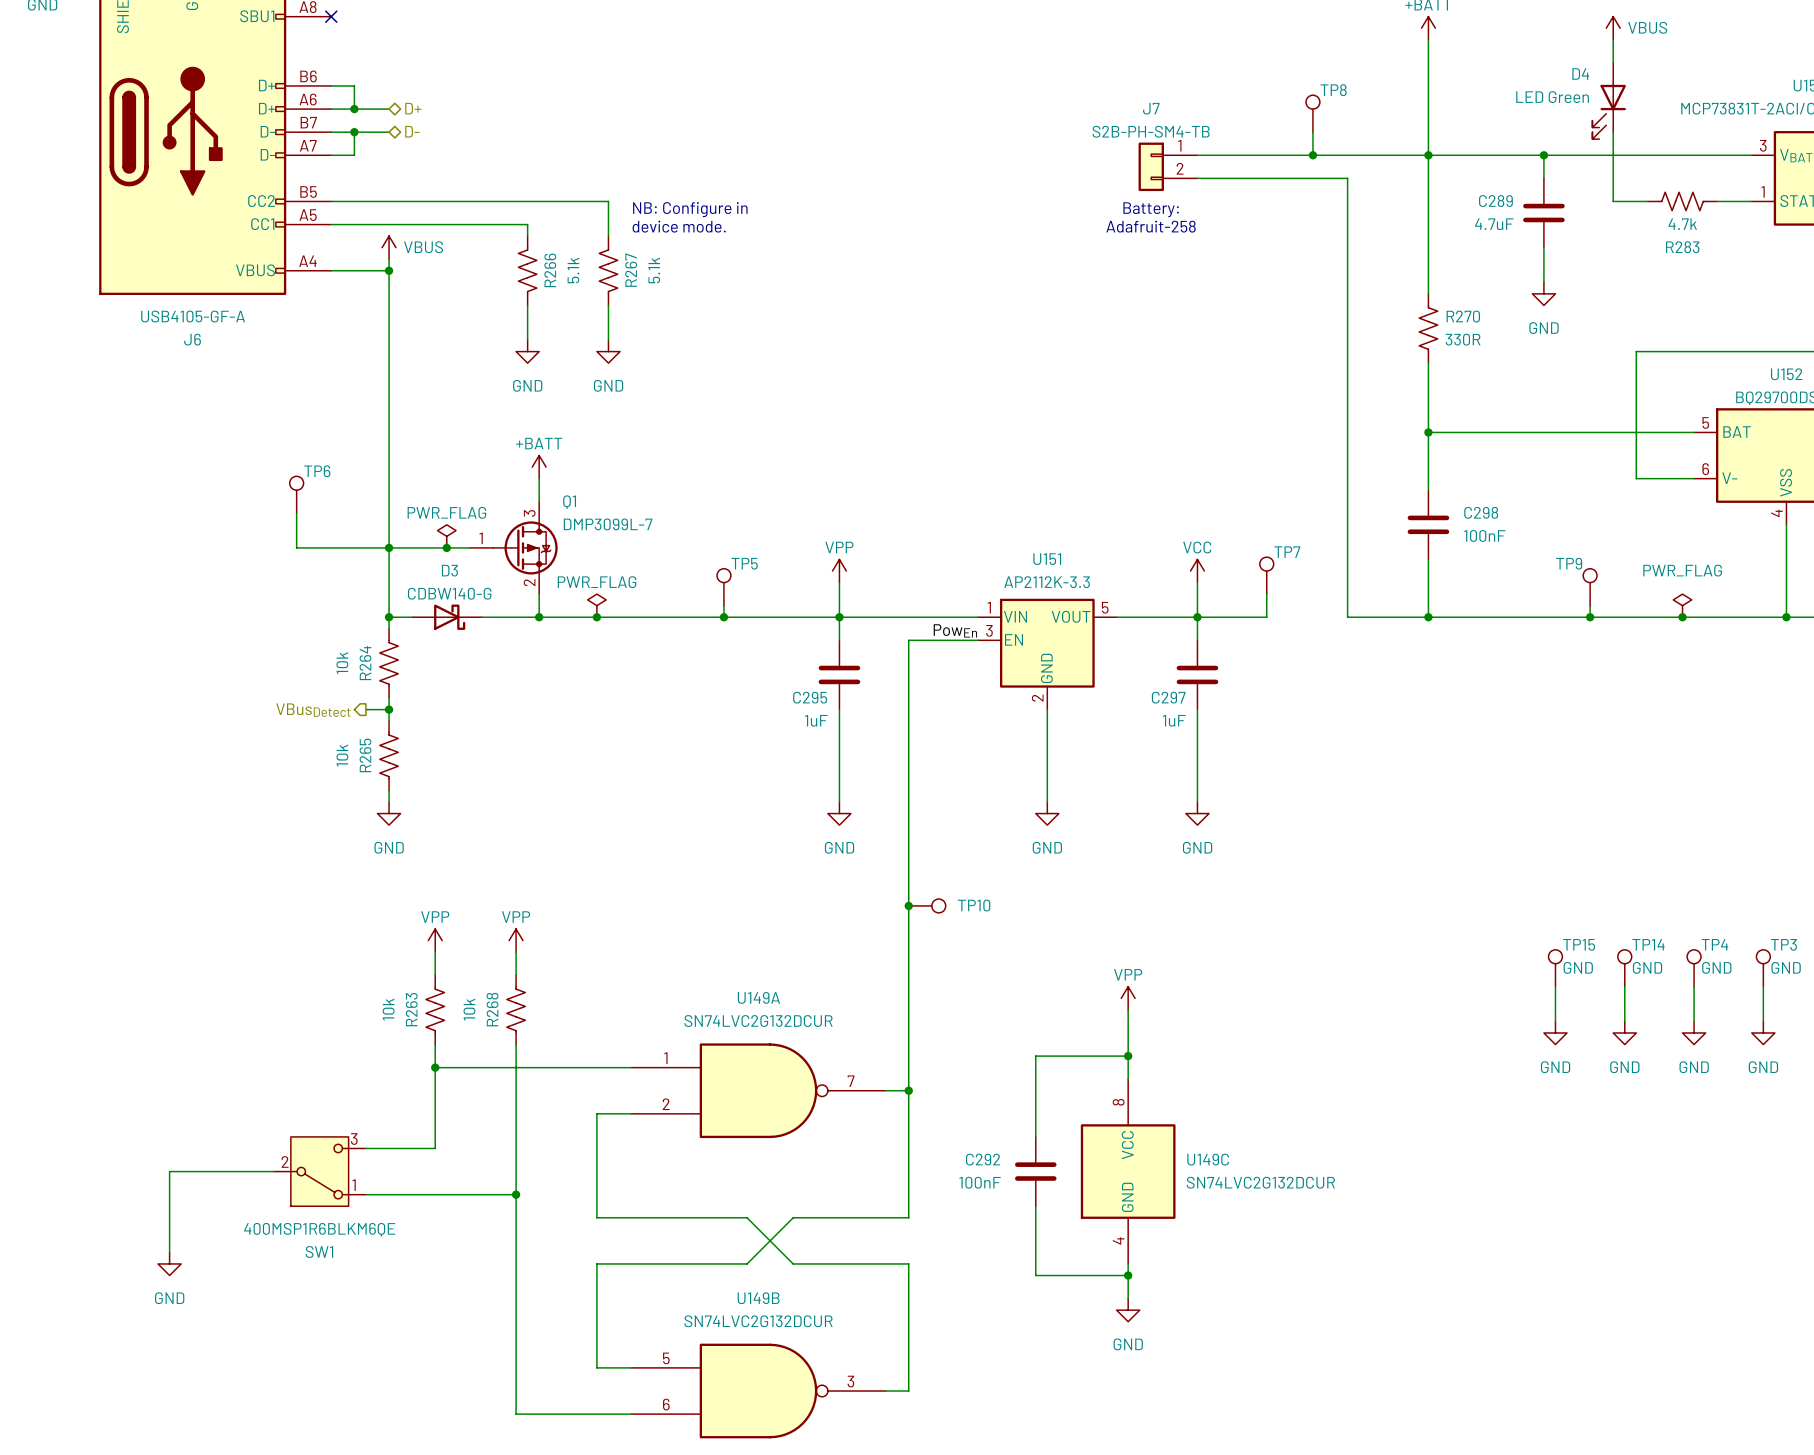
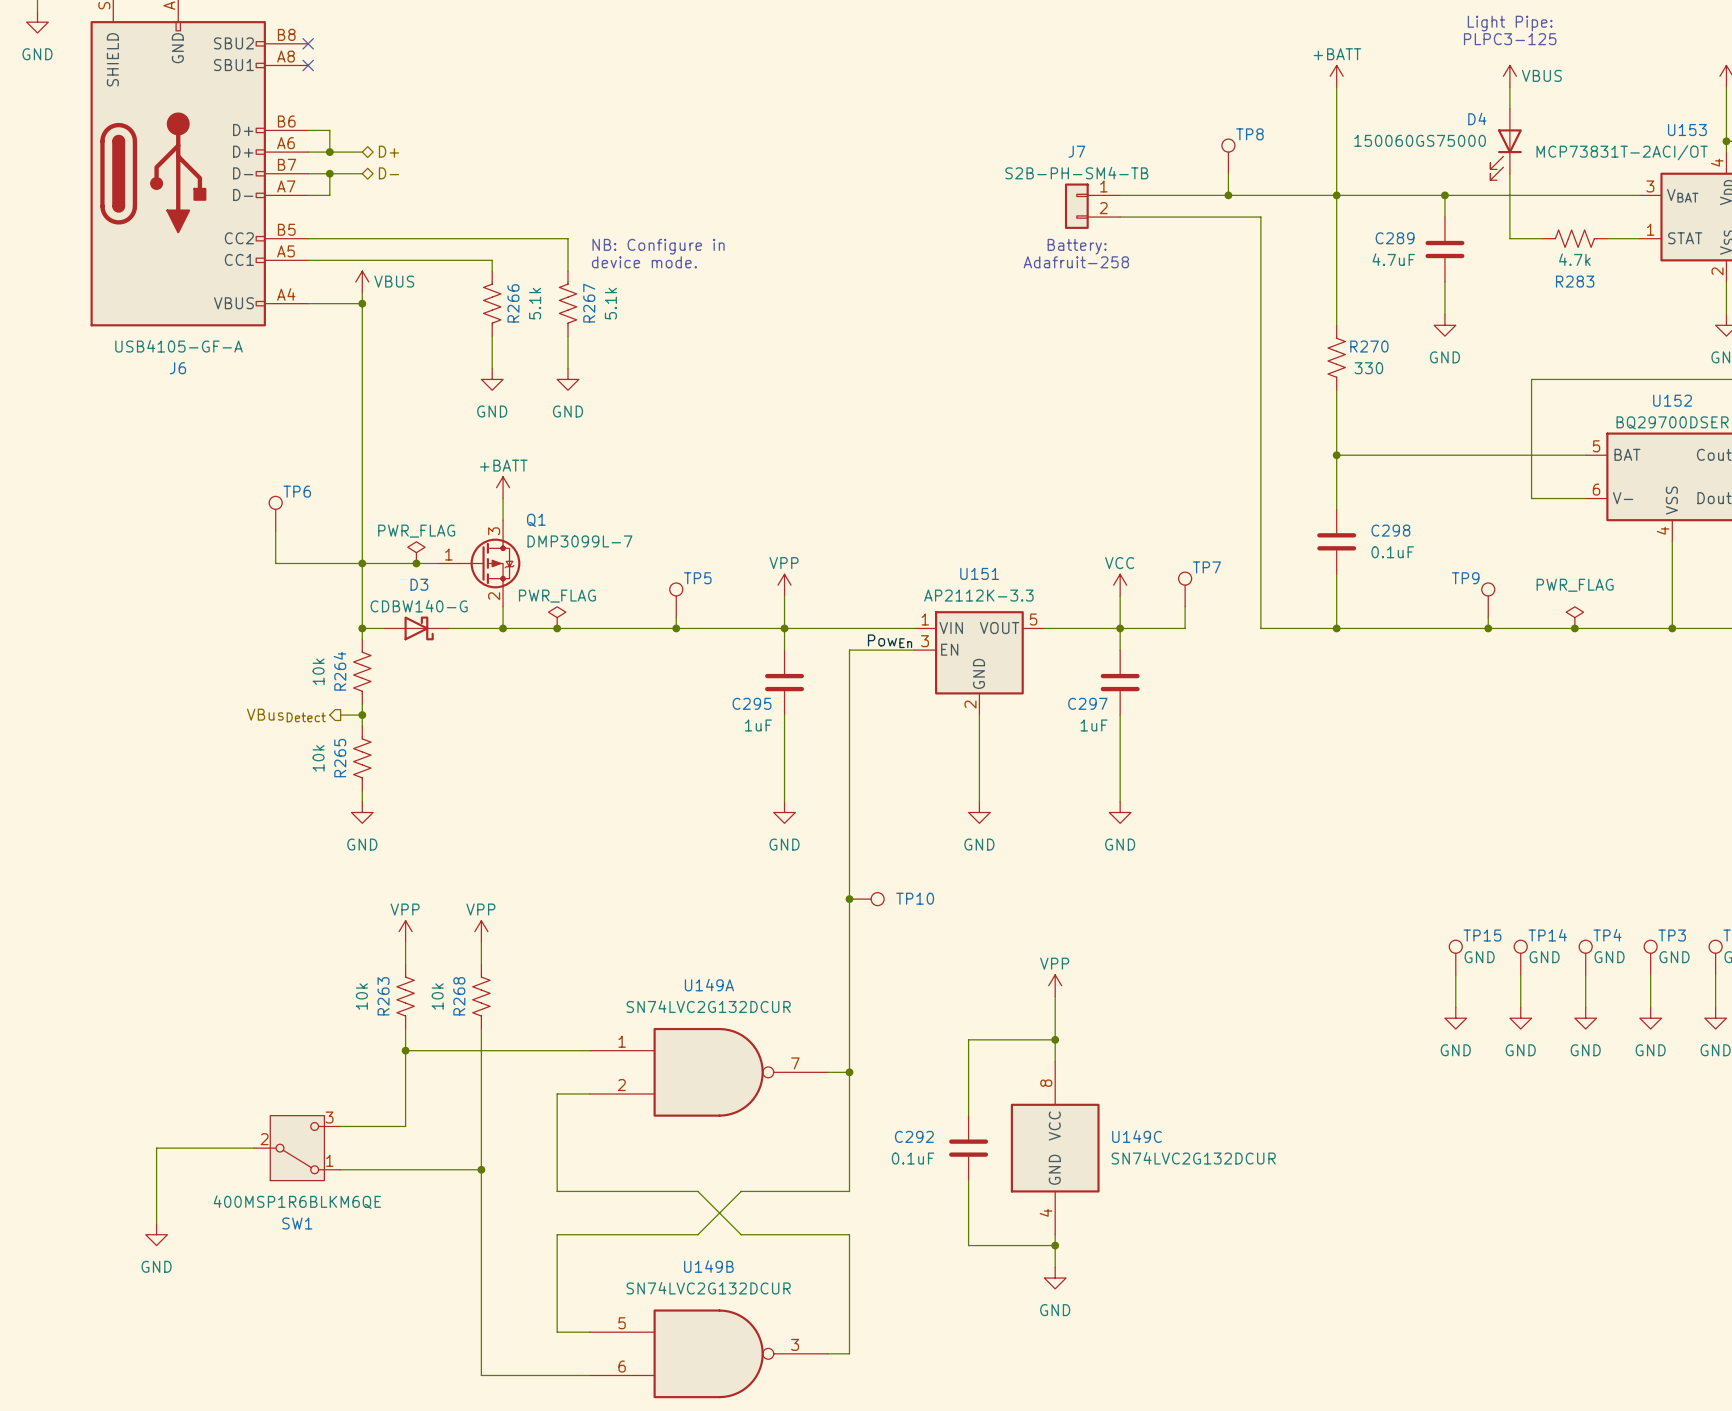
D4 value: LED Green (1552, 97) -> 150060GS75000 (1420, 140)
R270 value: 330R (1463, 339) -> 330 (1368, 368)
C298 value: 100nF (1484, 535) -> 0.1uF (1392, 552)
C292 value: 100nF (980, 1182) -> 0.1uF (913, 1158)

